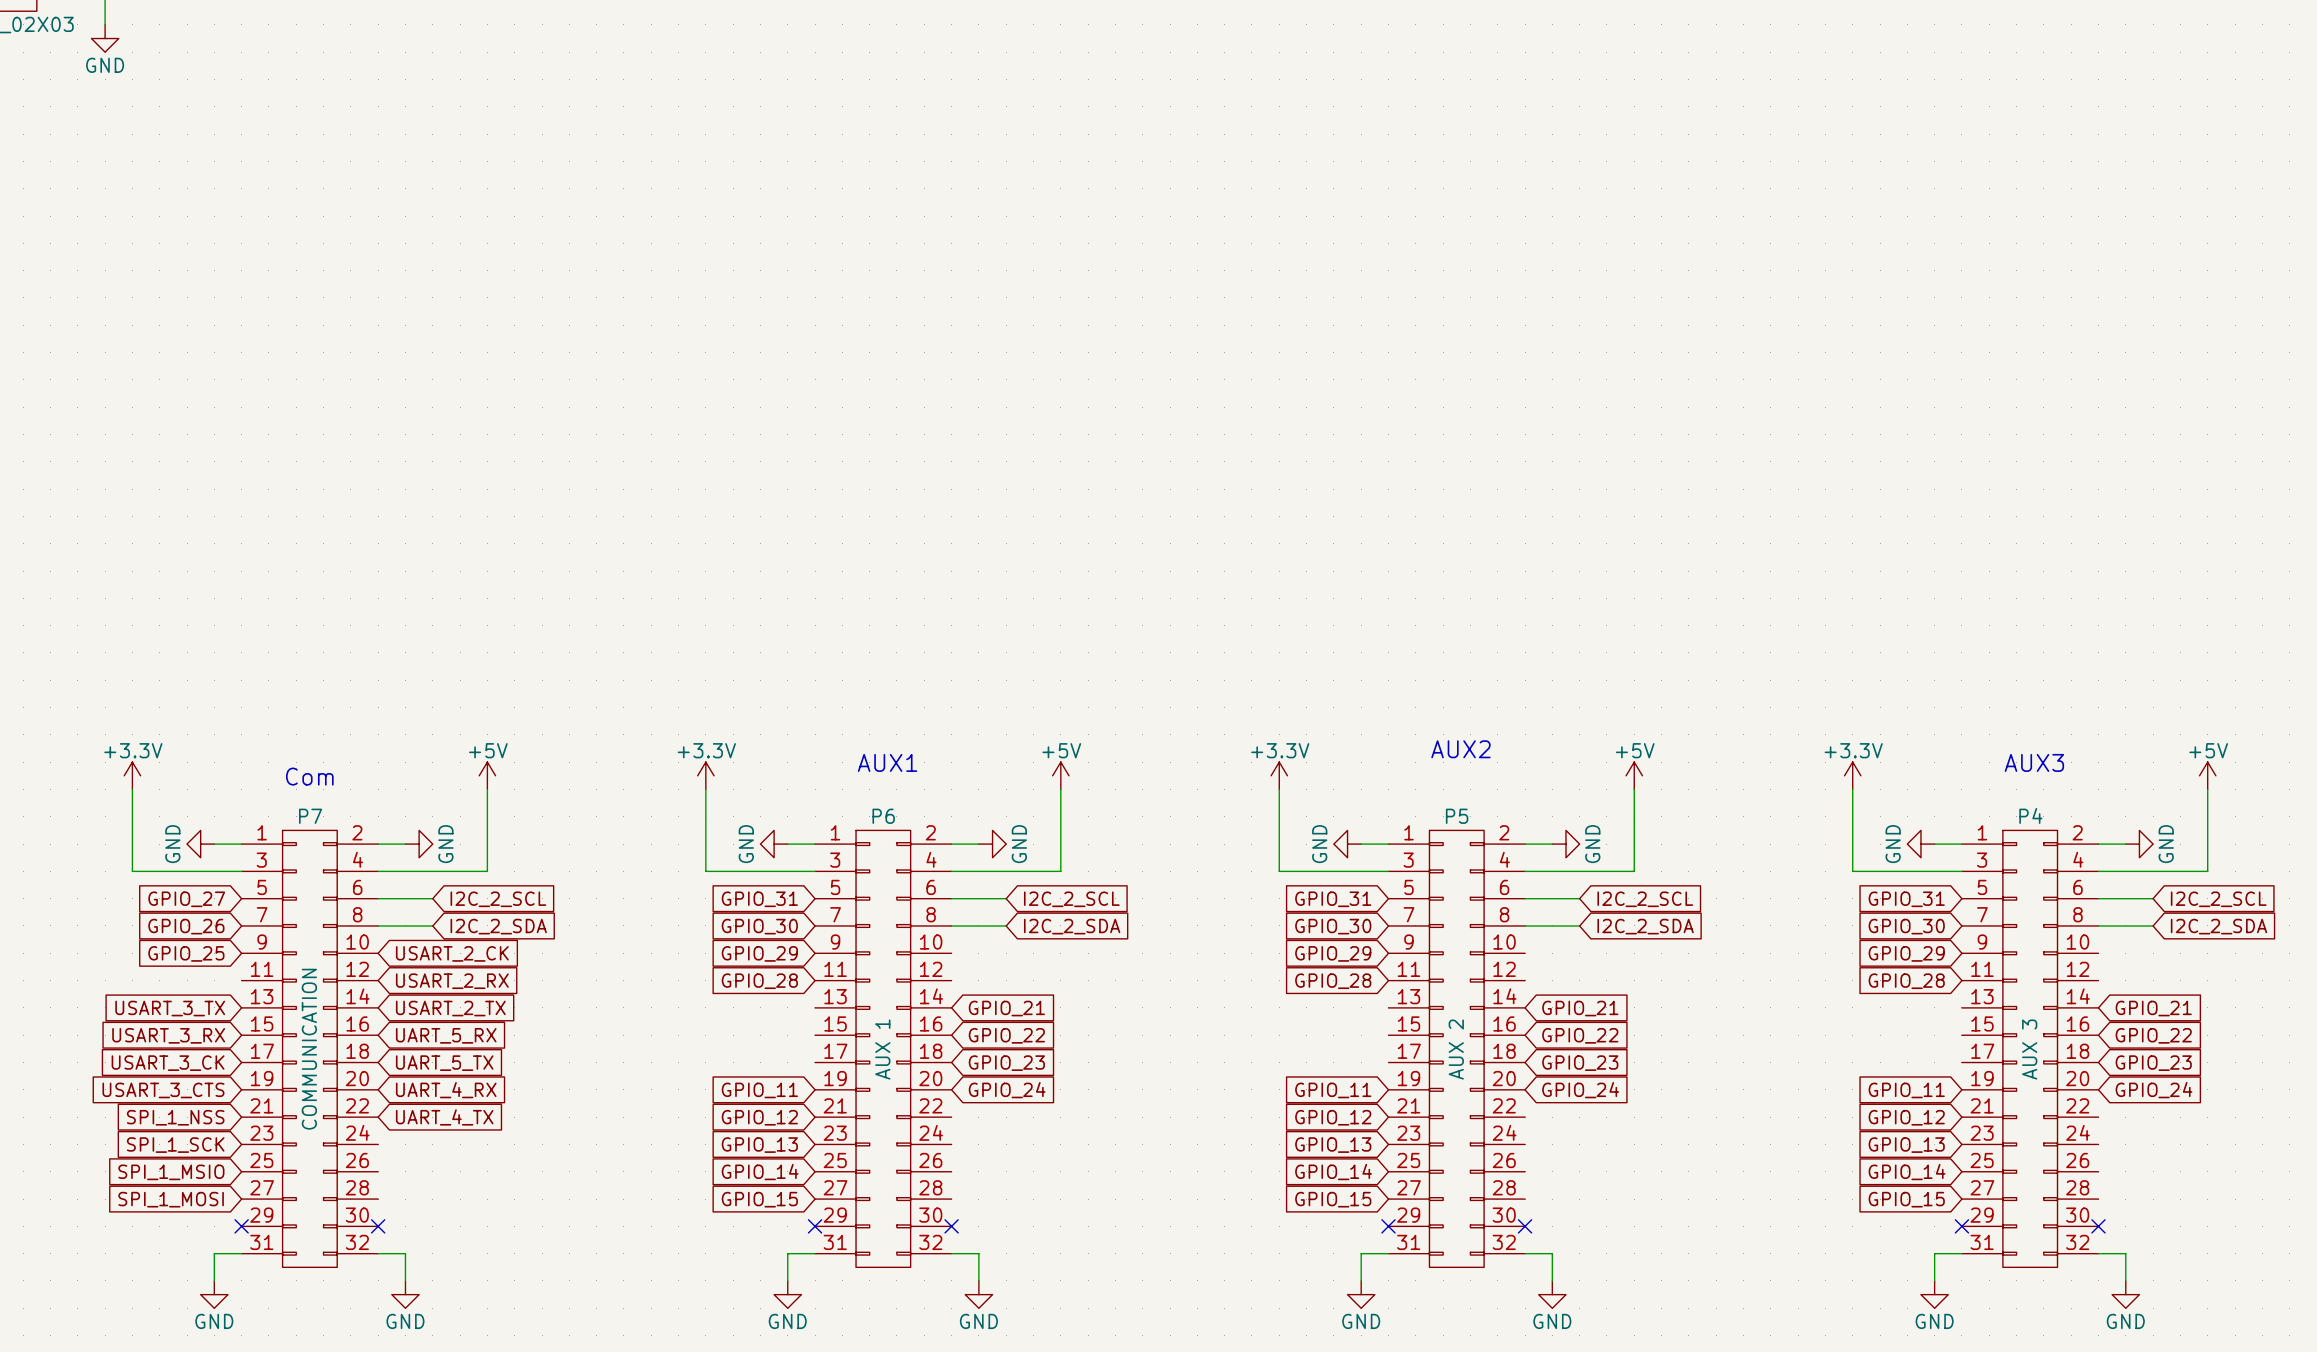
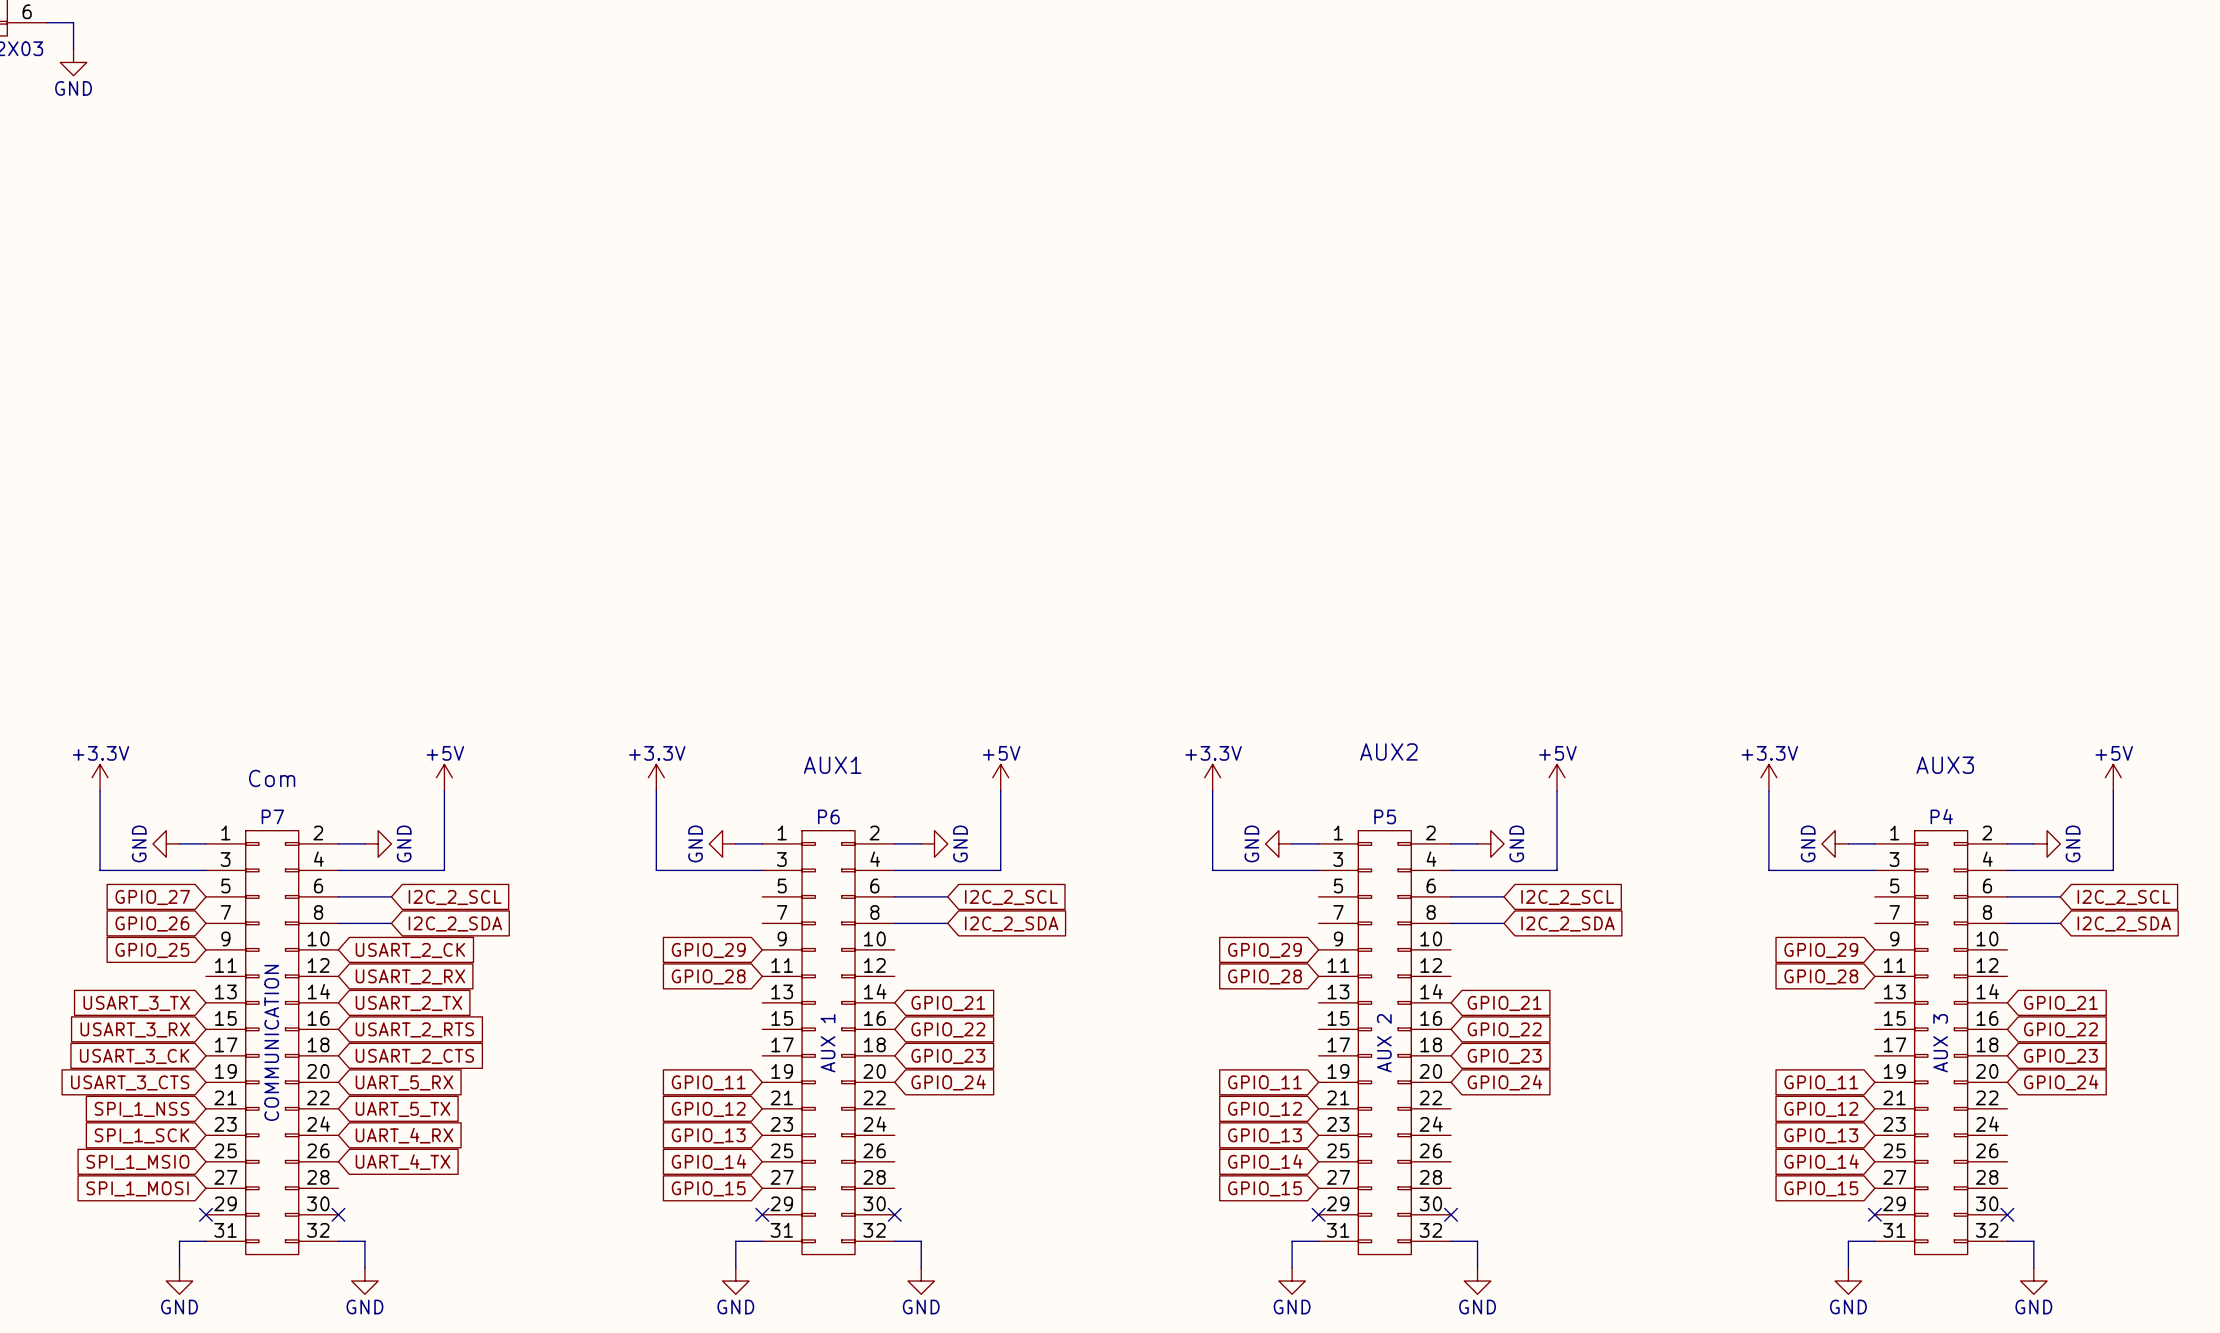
global label: GPIO_31 (759, 899) -> none
global label: GPIO_31 (1333, 899) -> none
global label: GPIO_31 (1906, 899) -> none
global label: GPIO_30 (759, 926) -> none
global label: GPIO_30 (1333, 926) -> none
global label: GPIO_30 (1906, 926) -> none
global label: UART_5_RX (446, 1035) -> USART_2_RTS (414, 1029)
global label: UART_5_TX (444, 1063) -> USART_2_CTS (414, 1056)
global label: UART_4_RX (446, 1090) -> UART_5_RX (404, 1082)
global label: UART_4_TX (444, 1117) -> UART_5_TX (403, 1109)
global label: none -> UART_4_RX (404, 1135)
global label: none -> UART_4_TX (403, 1162)

